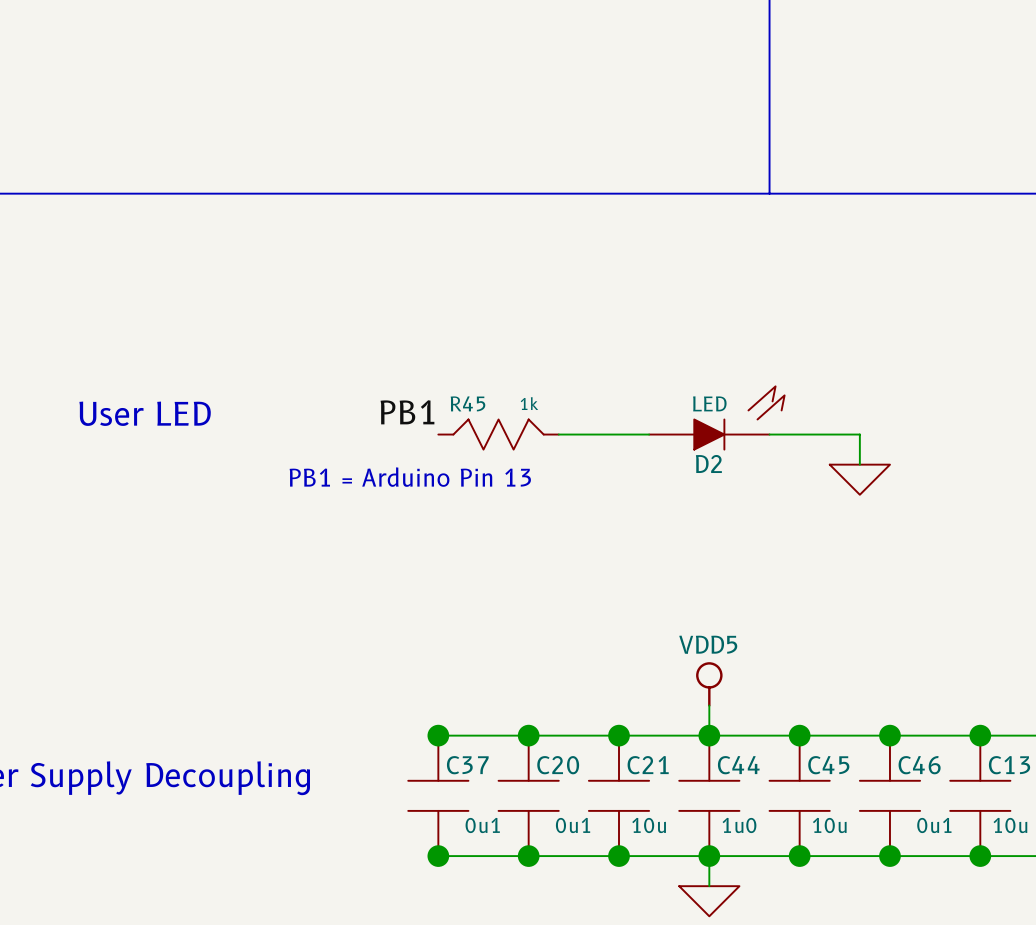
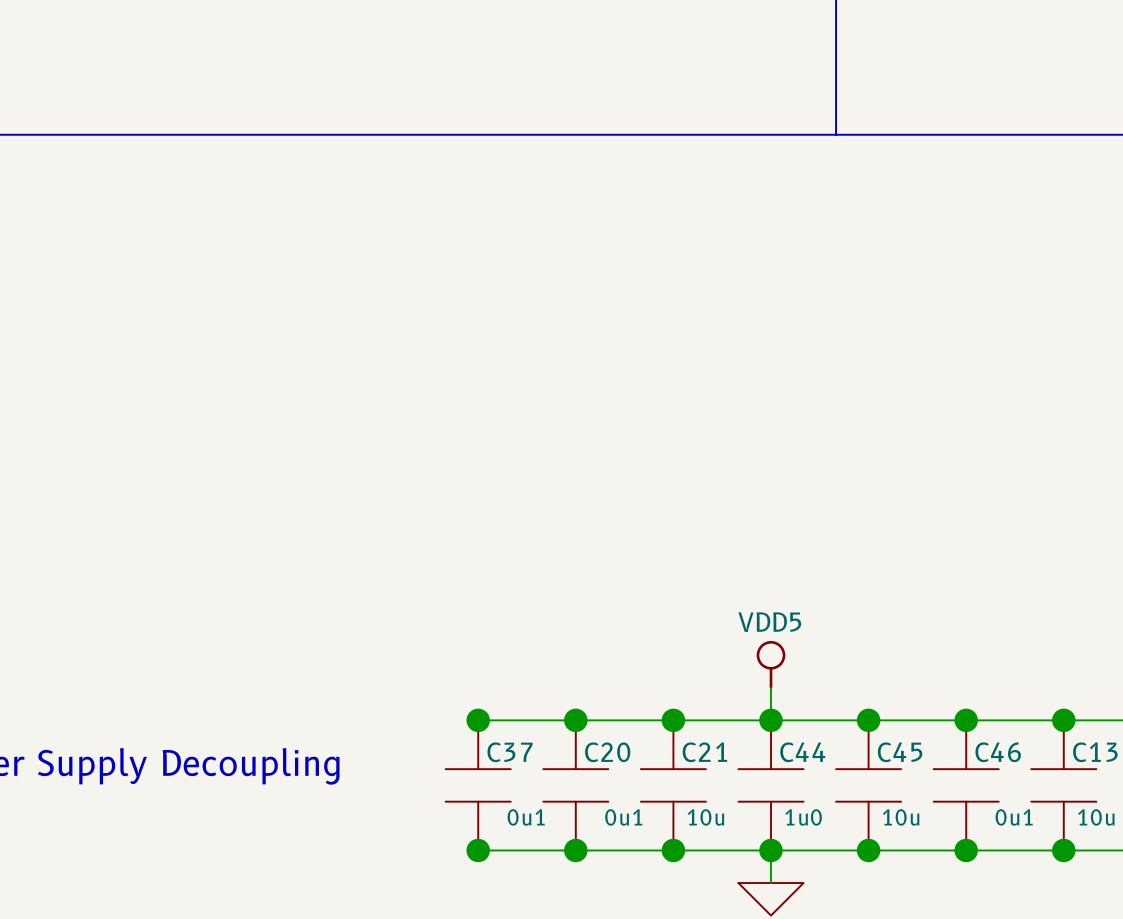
label: PB1 (407, 412) -> none
text: User LED (145, 413) -> none
D2: LED (716, 418) -> none
R45: 1k (498, 434) -> none
wire: (558, 434) (649, 434) -> none
wire: (769, 434) (859, 434) (859, 464) -> none
text: PB1 = Arduino Pin 13 (410, 477) -> none
power symbol: (859, 479) -> none

